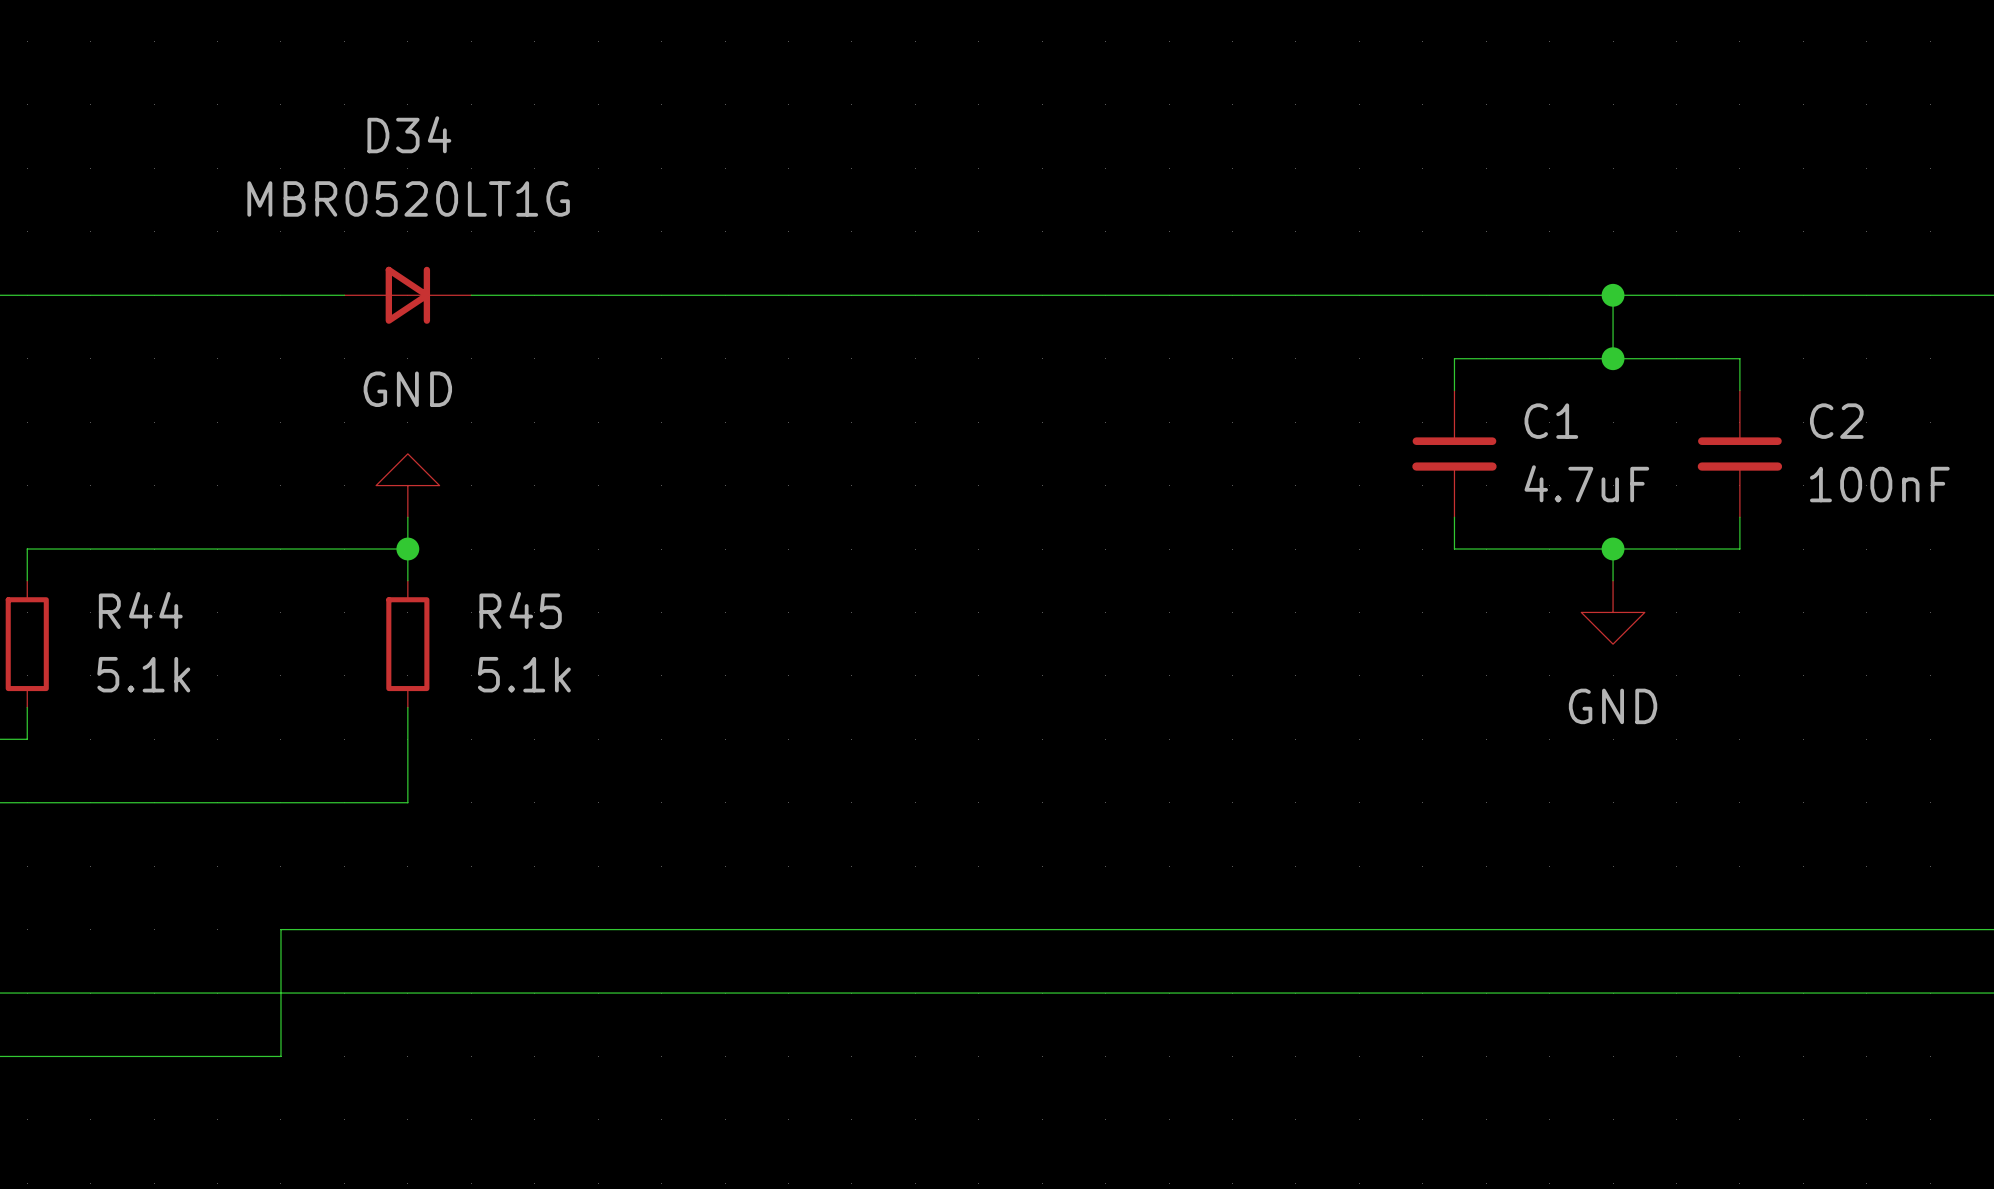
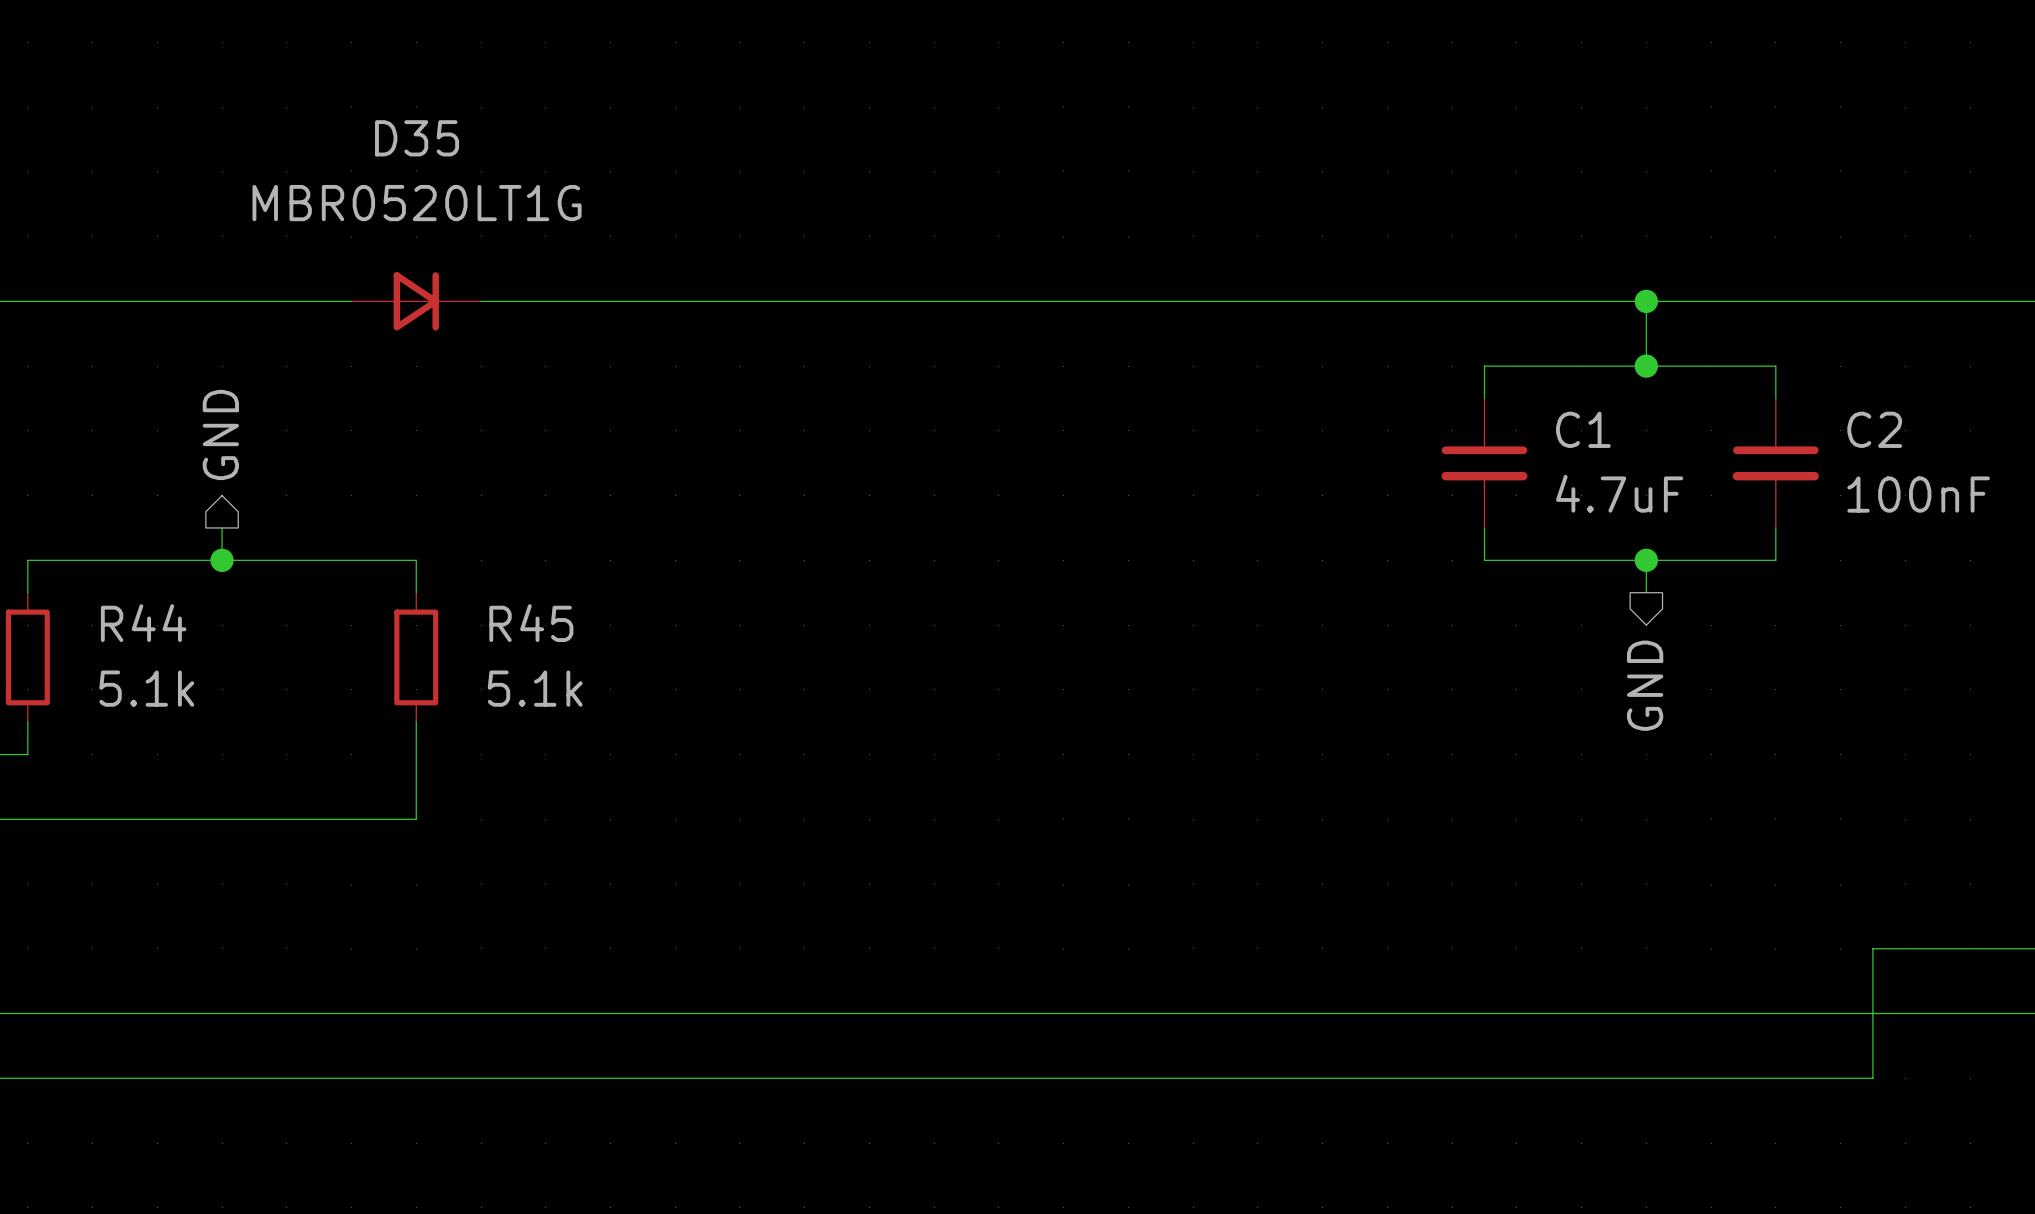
D34 name: D34 (409, 134) -> D35 (417, 138)
hierarchical label: none -> GND (220, 434)
power symbol: GND (407, 485) -> none
wire: (407, 517) (407, 549) -> (222, 527) (222, 560)
junction: none -> (222, 560)
junction: (407, 549) -> none
power symbol: GND (1613, 612) -> none
hierarchical label: none -> GND (1645, 685)
wire: (1835, 929) (280, 929) (280, 1056) -> (1872, 948) (1872, 1078) (286, 1078)

